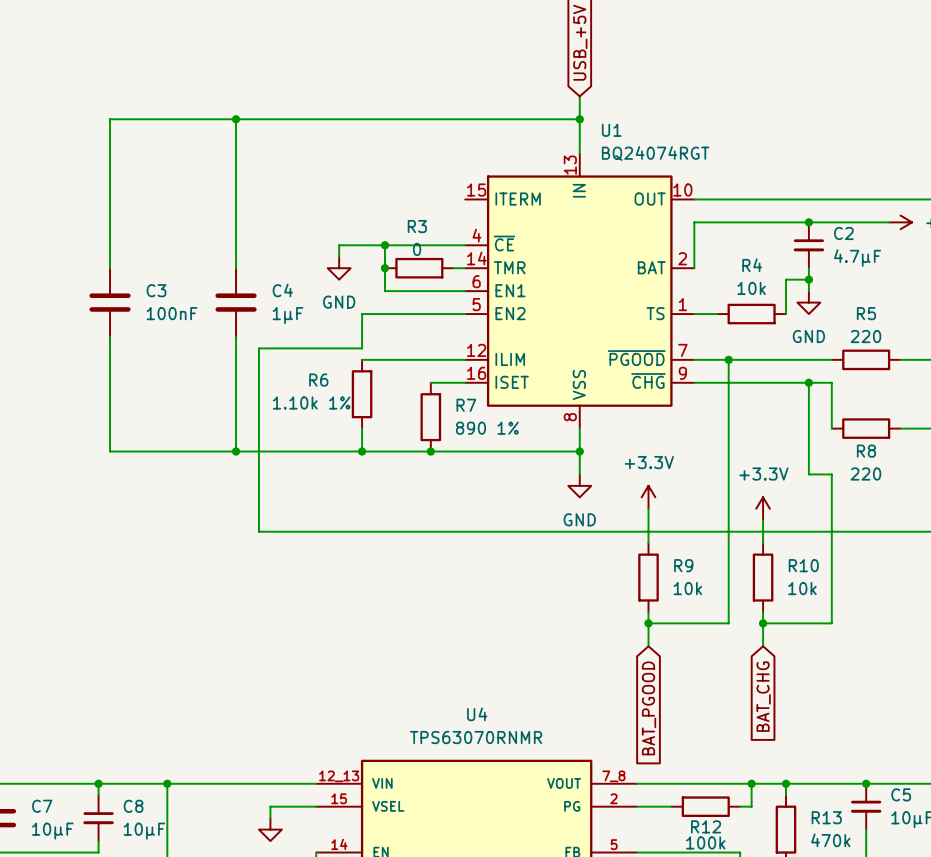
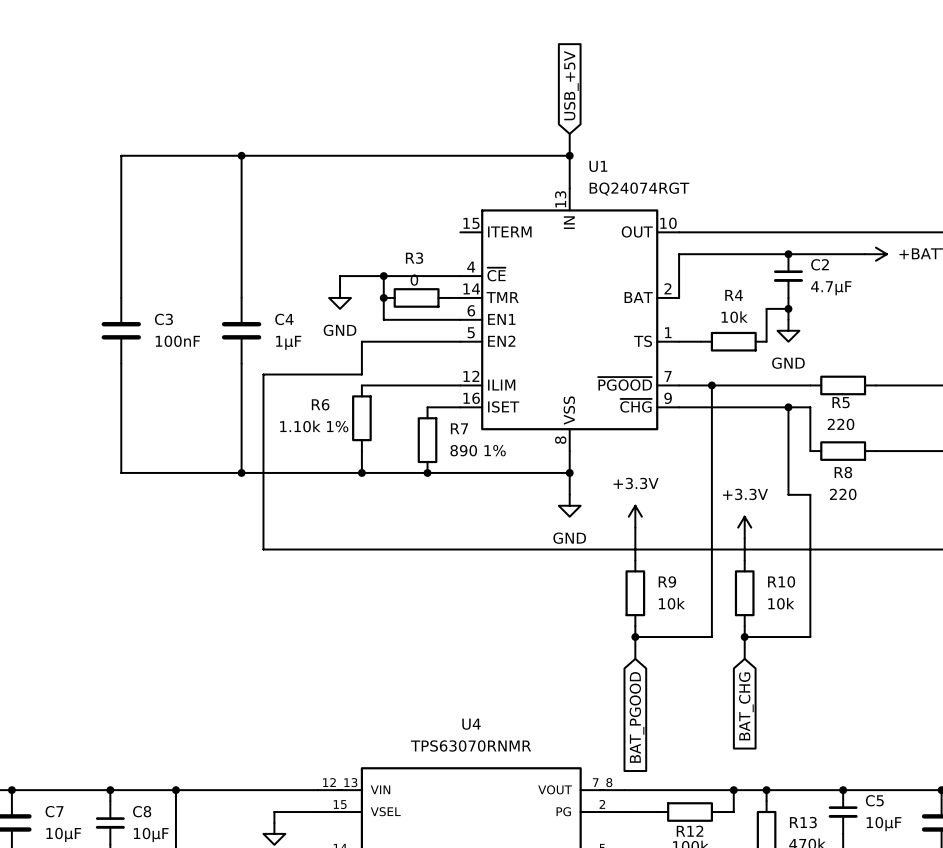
R5 name position: R5 (866, 313) -> R5 (841, 402)
R5 value position: 220 (865, 336) -> 220 (841, 424)

